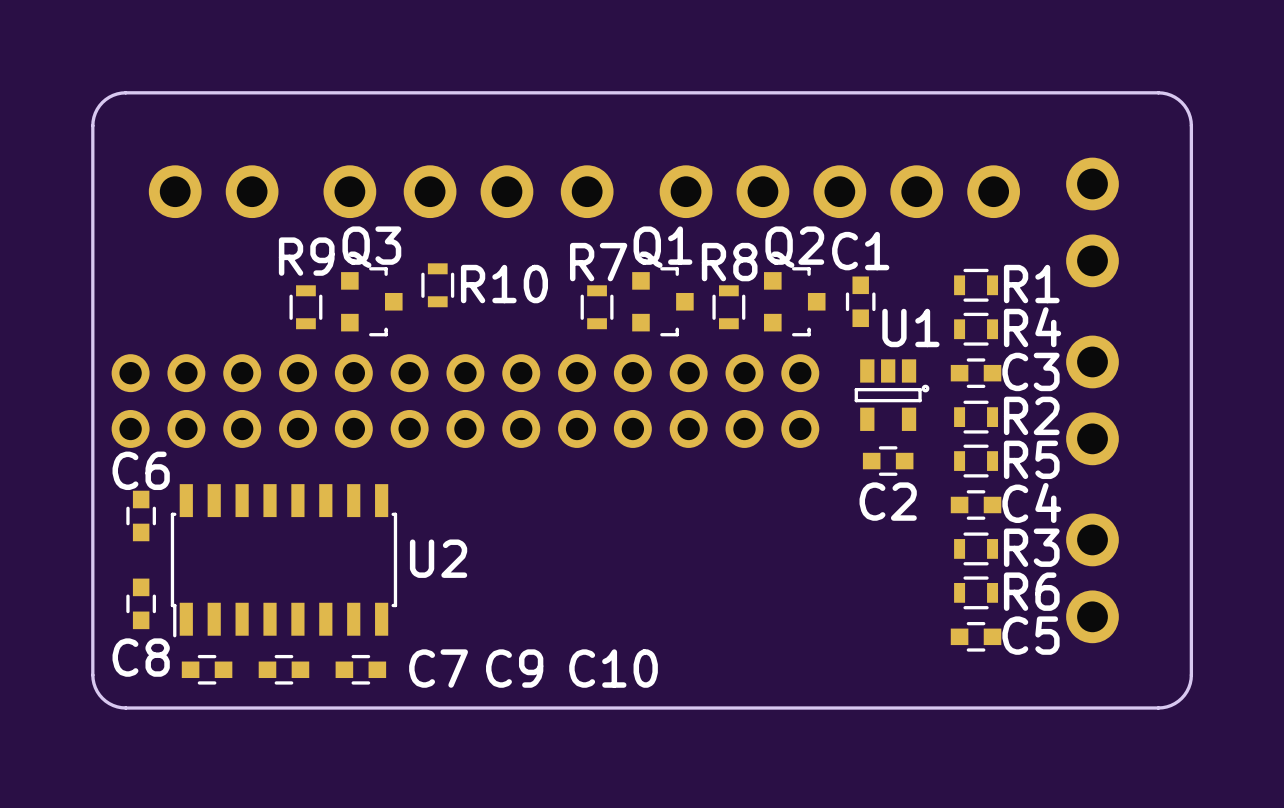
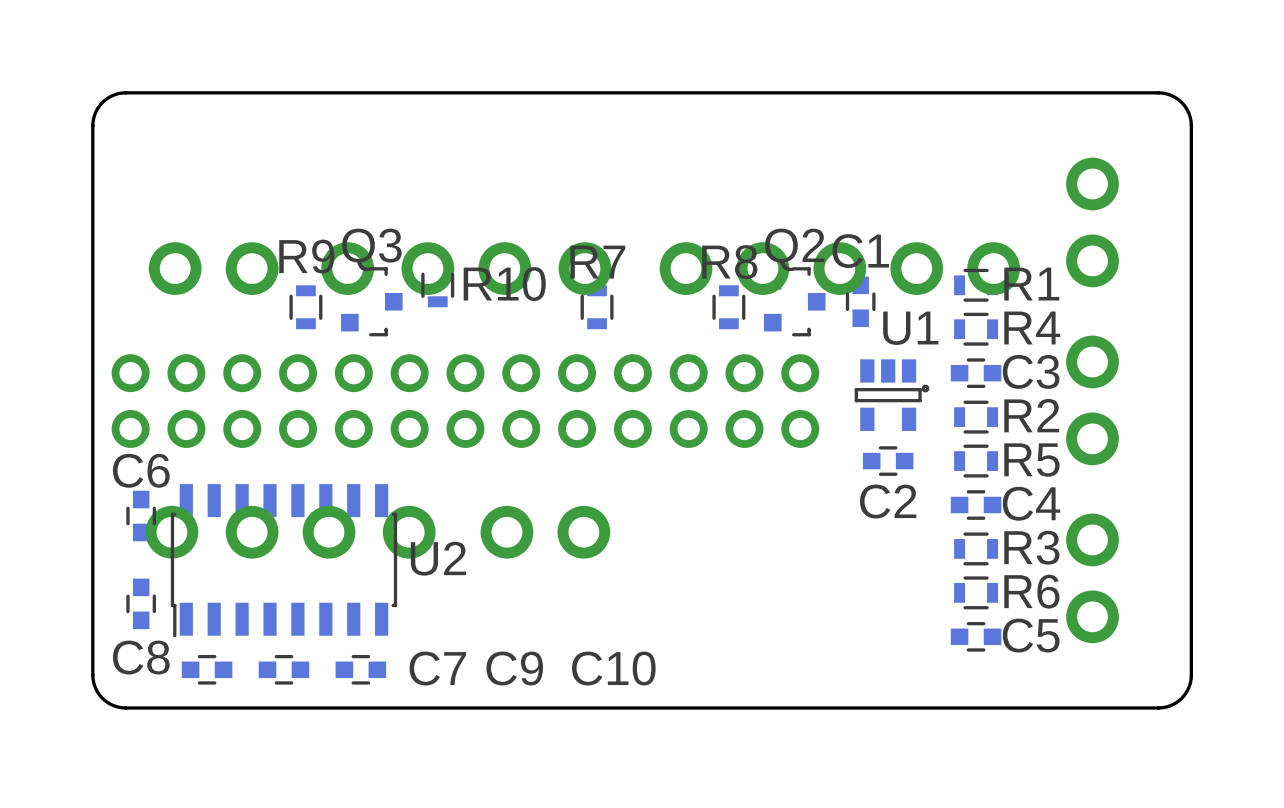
part position: (213, 191) -> (213, 268)
part position: (468, 191) -> (466, 268)
part position: (839, 191) -> (839, 268)
Q1: (662, 301) -> none
part: none -> (290, 532)
part: none -> (545, 532)

